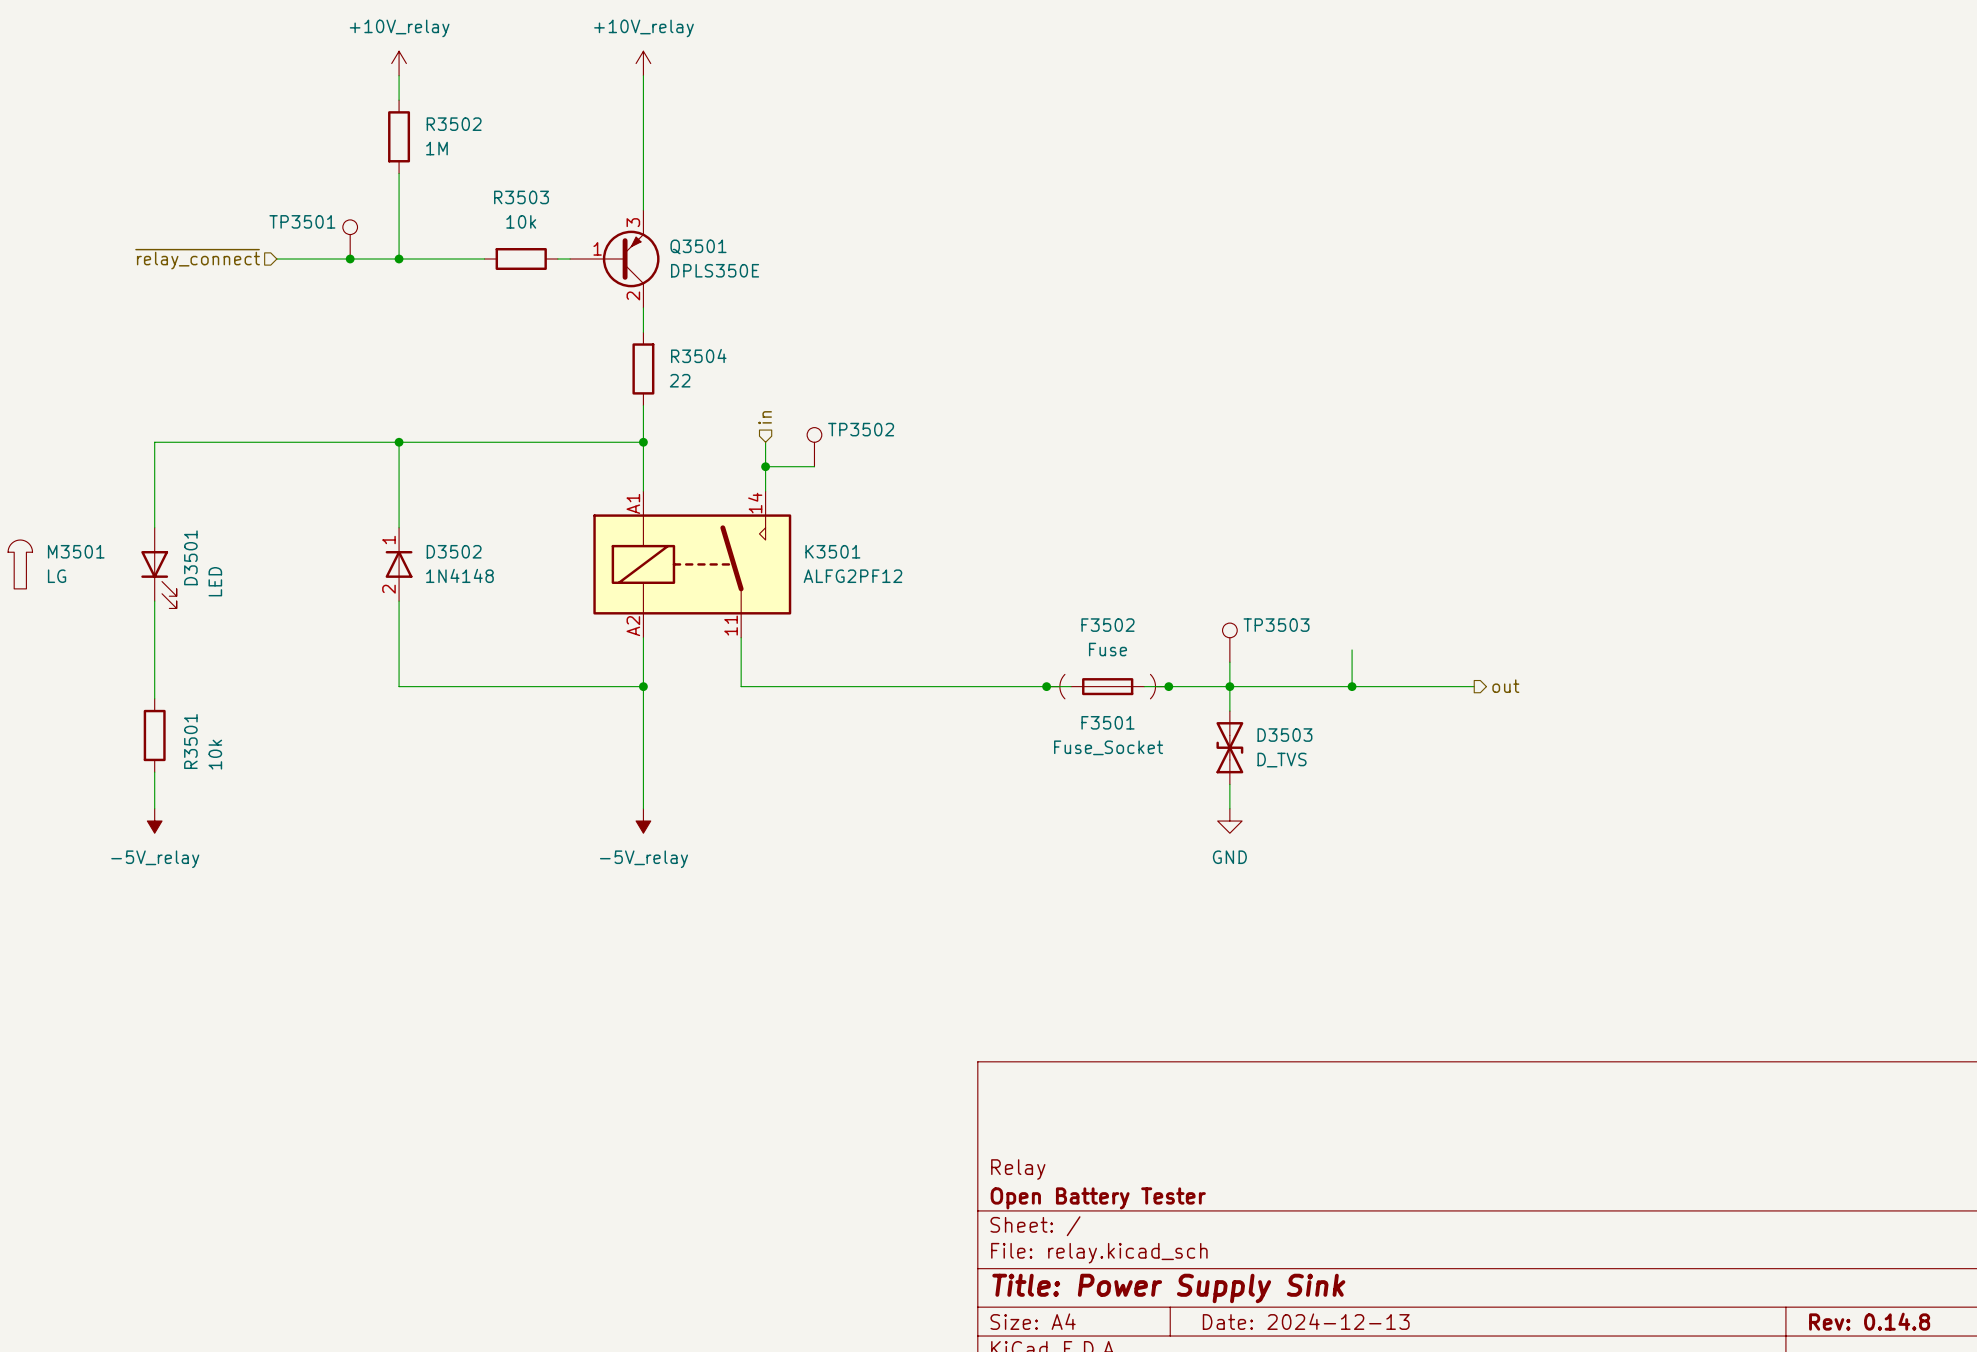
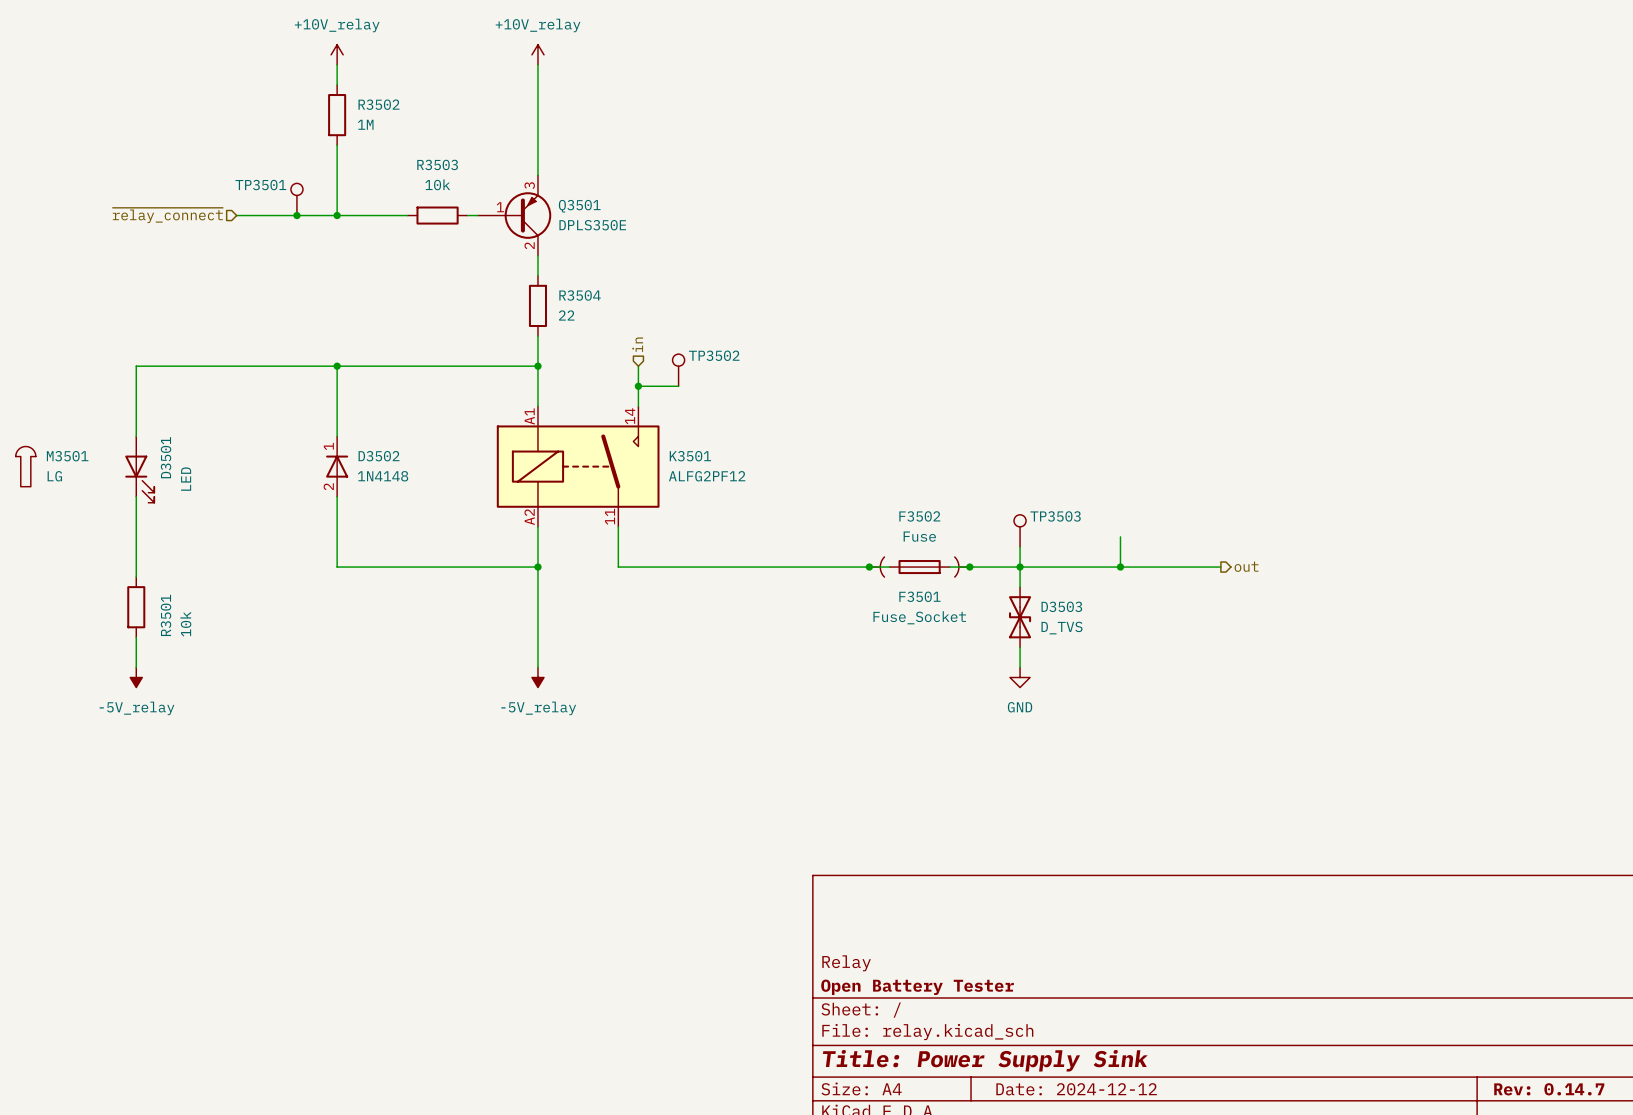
title block: Date: 2024-12-13 (1306, 1321) -> Date: 2024-12-12 (1076, 1089)
title block: Rev: 0.14.8 (1869, 1321) -> Rev: 0.14.7 (1549, 1089)

